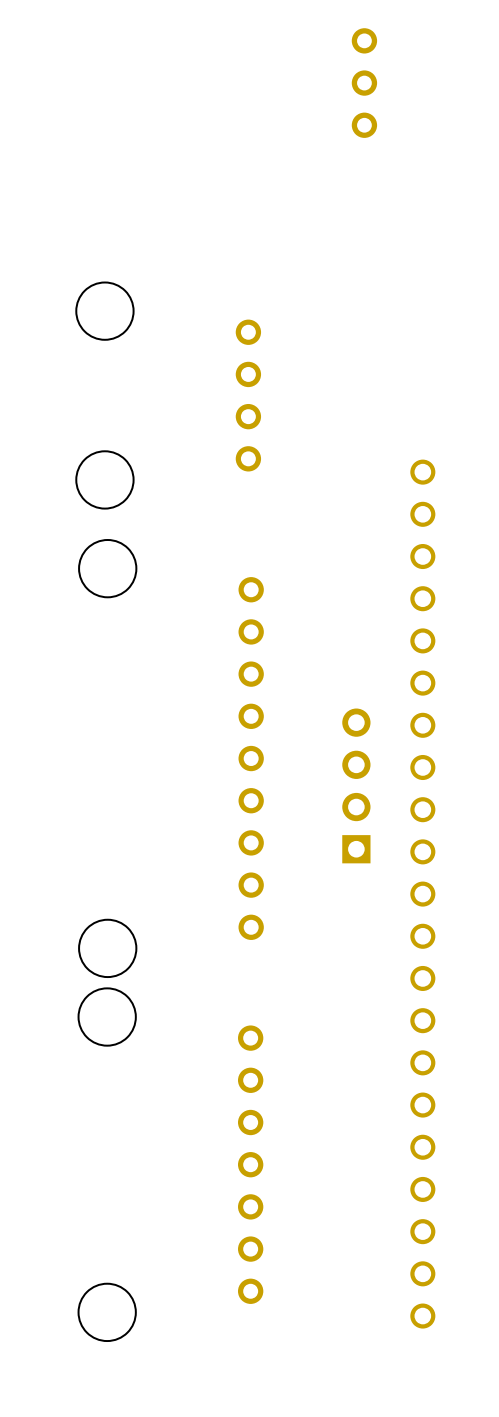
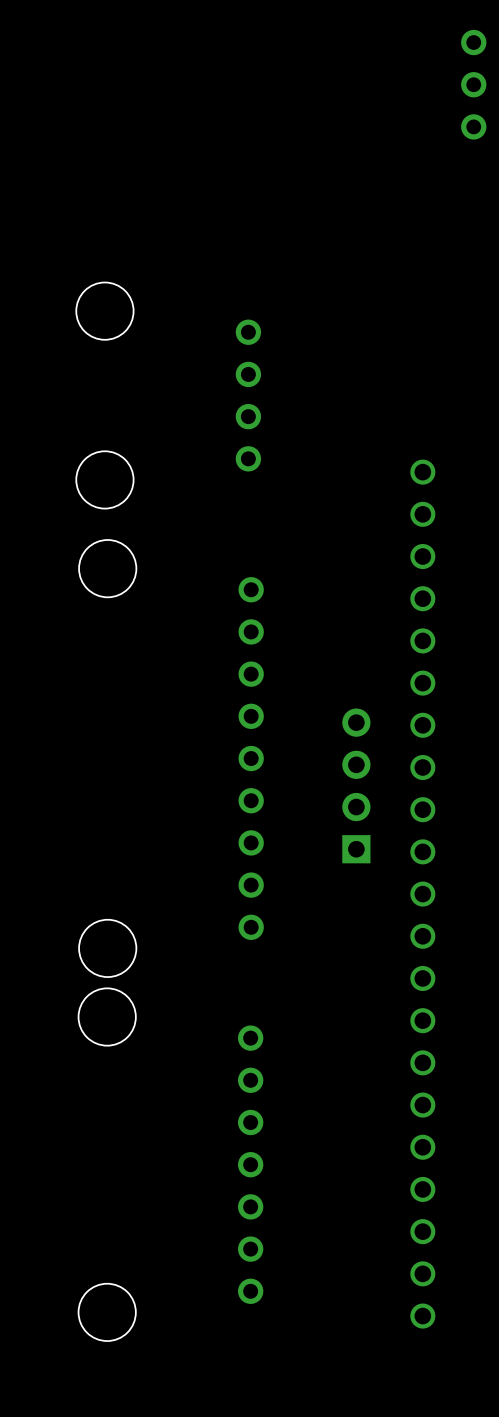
part position: (364, 83) -> (473, 84)

